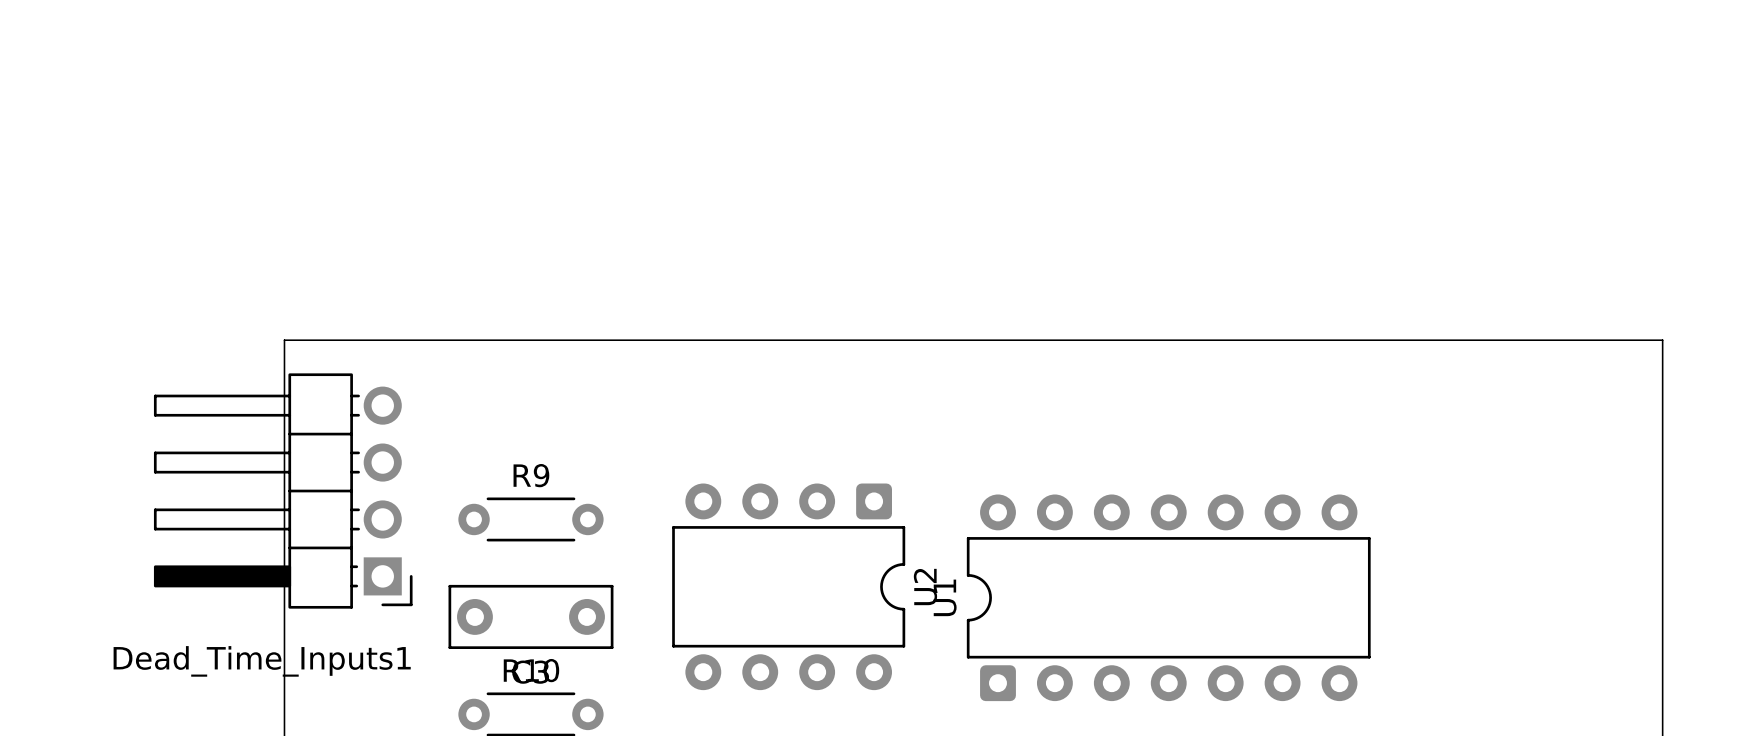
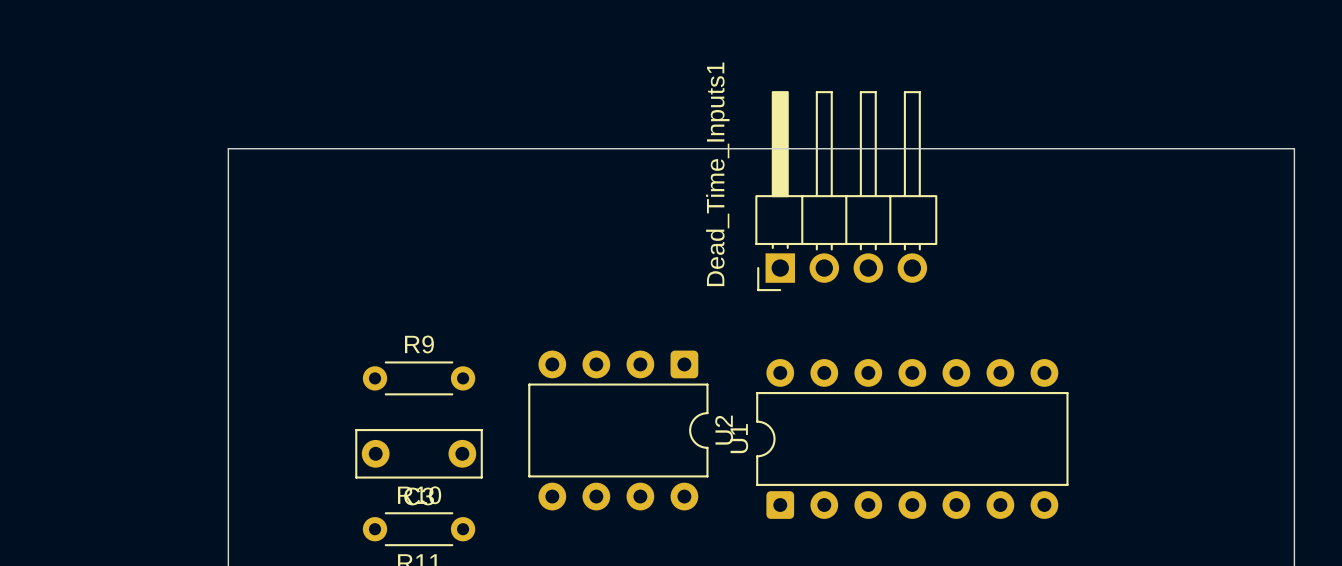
board edge: (284, 340) (1662, 340) -> (228, 239) (228, 148) (1294, 148) (1294, 239)
Dead_Time_Inputs1 rotation: 0° (283, 491) -> 90° clockwise (846, 191)
Dead_Time_Inputs1 position: (283, 491) -> (846, 191)

